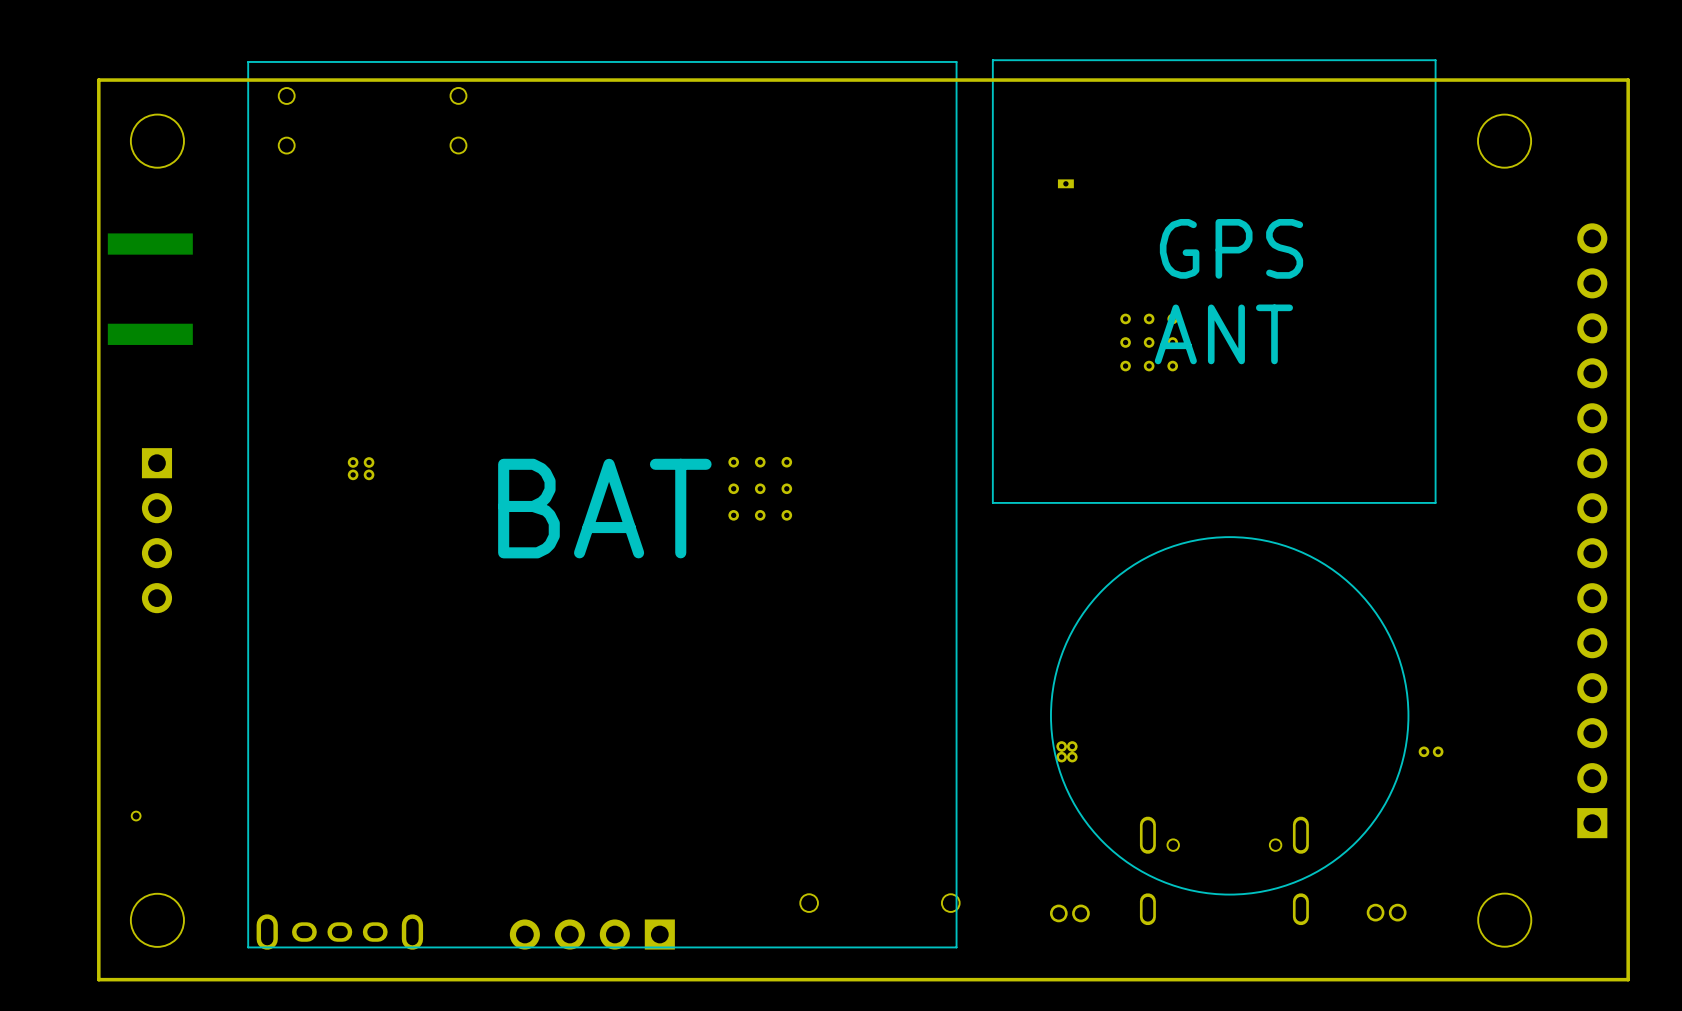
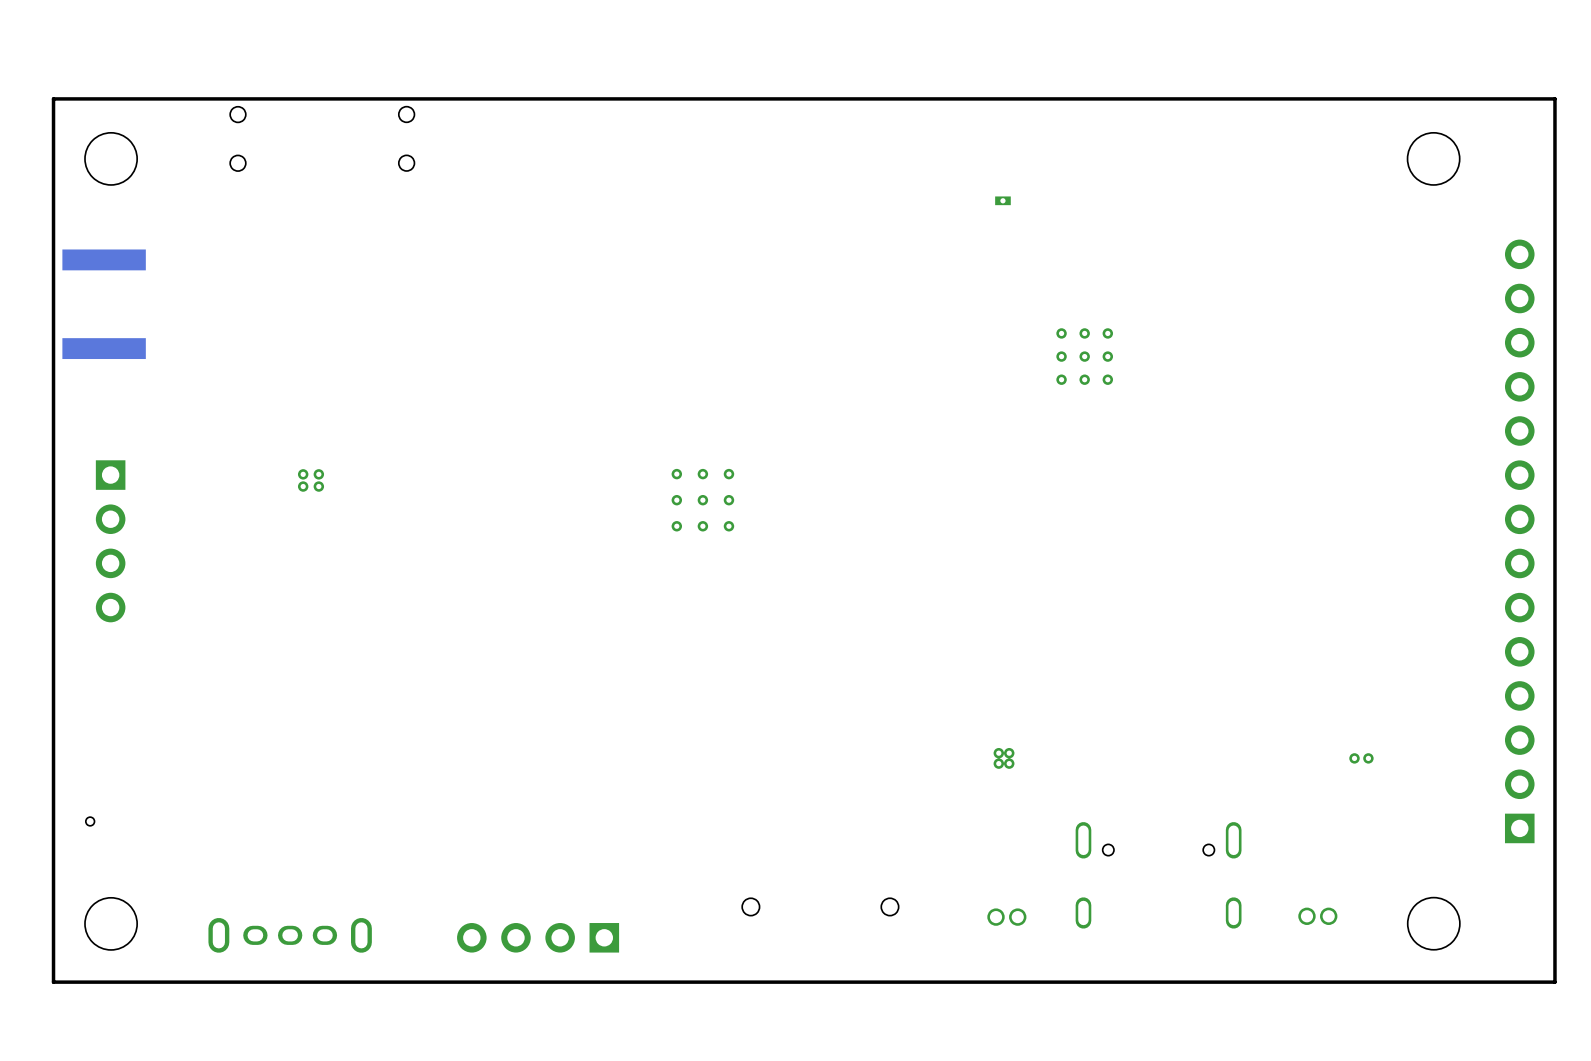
line: (1435, 60) (992, 60) (992, 502) (1435, 502) (1435, 60) -> none
line: (956, 61) (248, 61) (248, 947) (956, 947) (956, 61) -> none
text: GPS (1231, 248) -> none
text: ANT (1223, 334) -> none
text: BAT (604, 508) -> none
drawing: [1050, 536, 1410, 896] -> none

